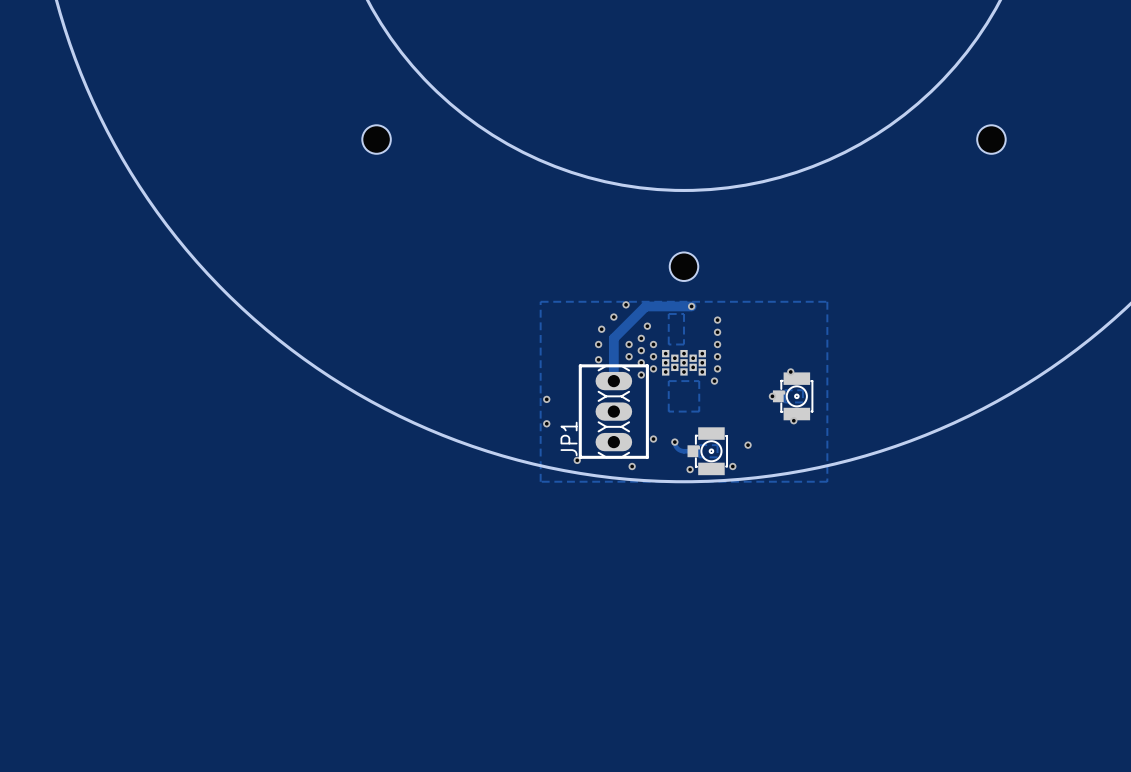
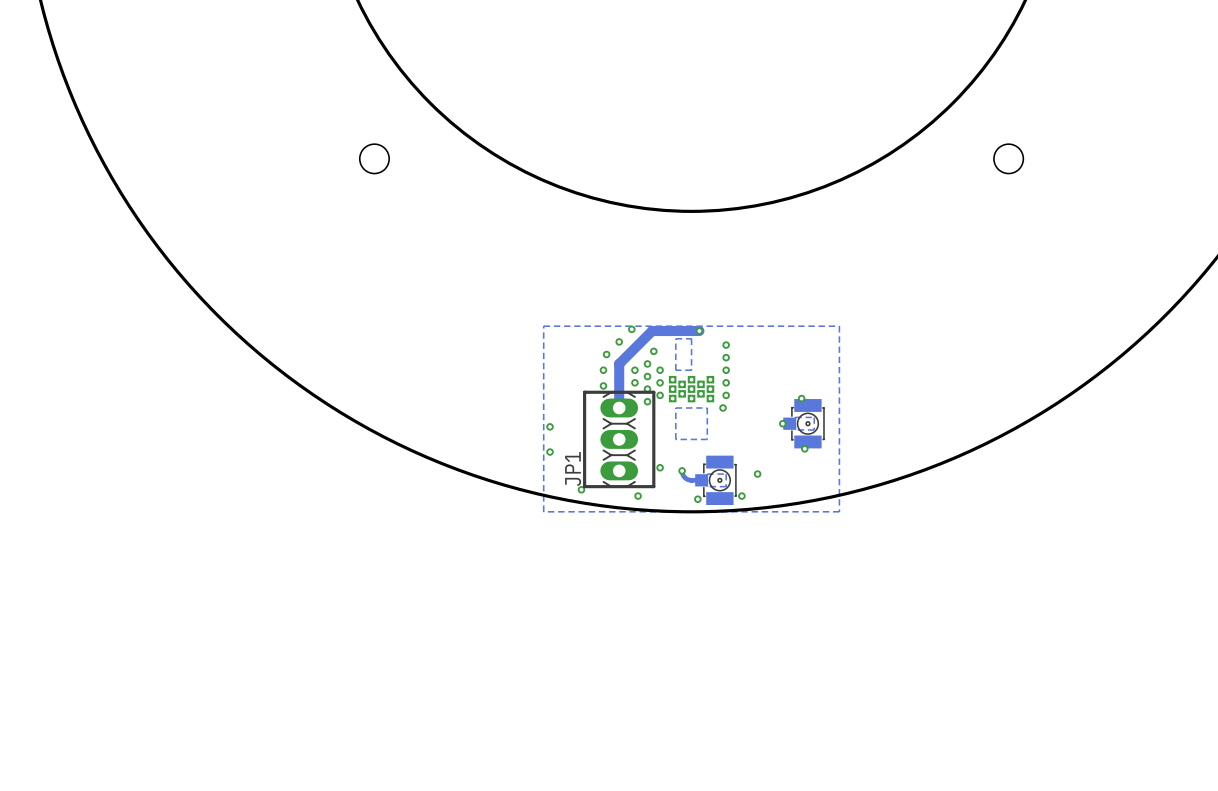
hole: (684, 266) -> none

